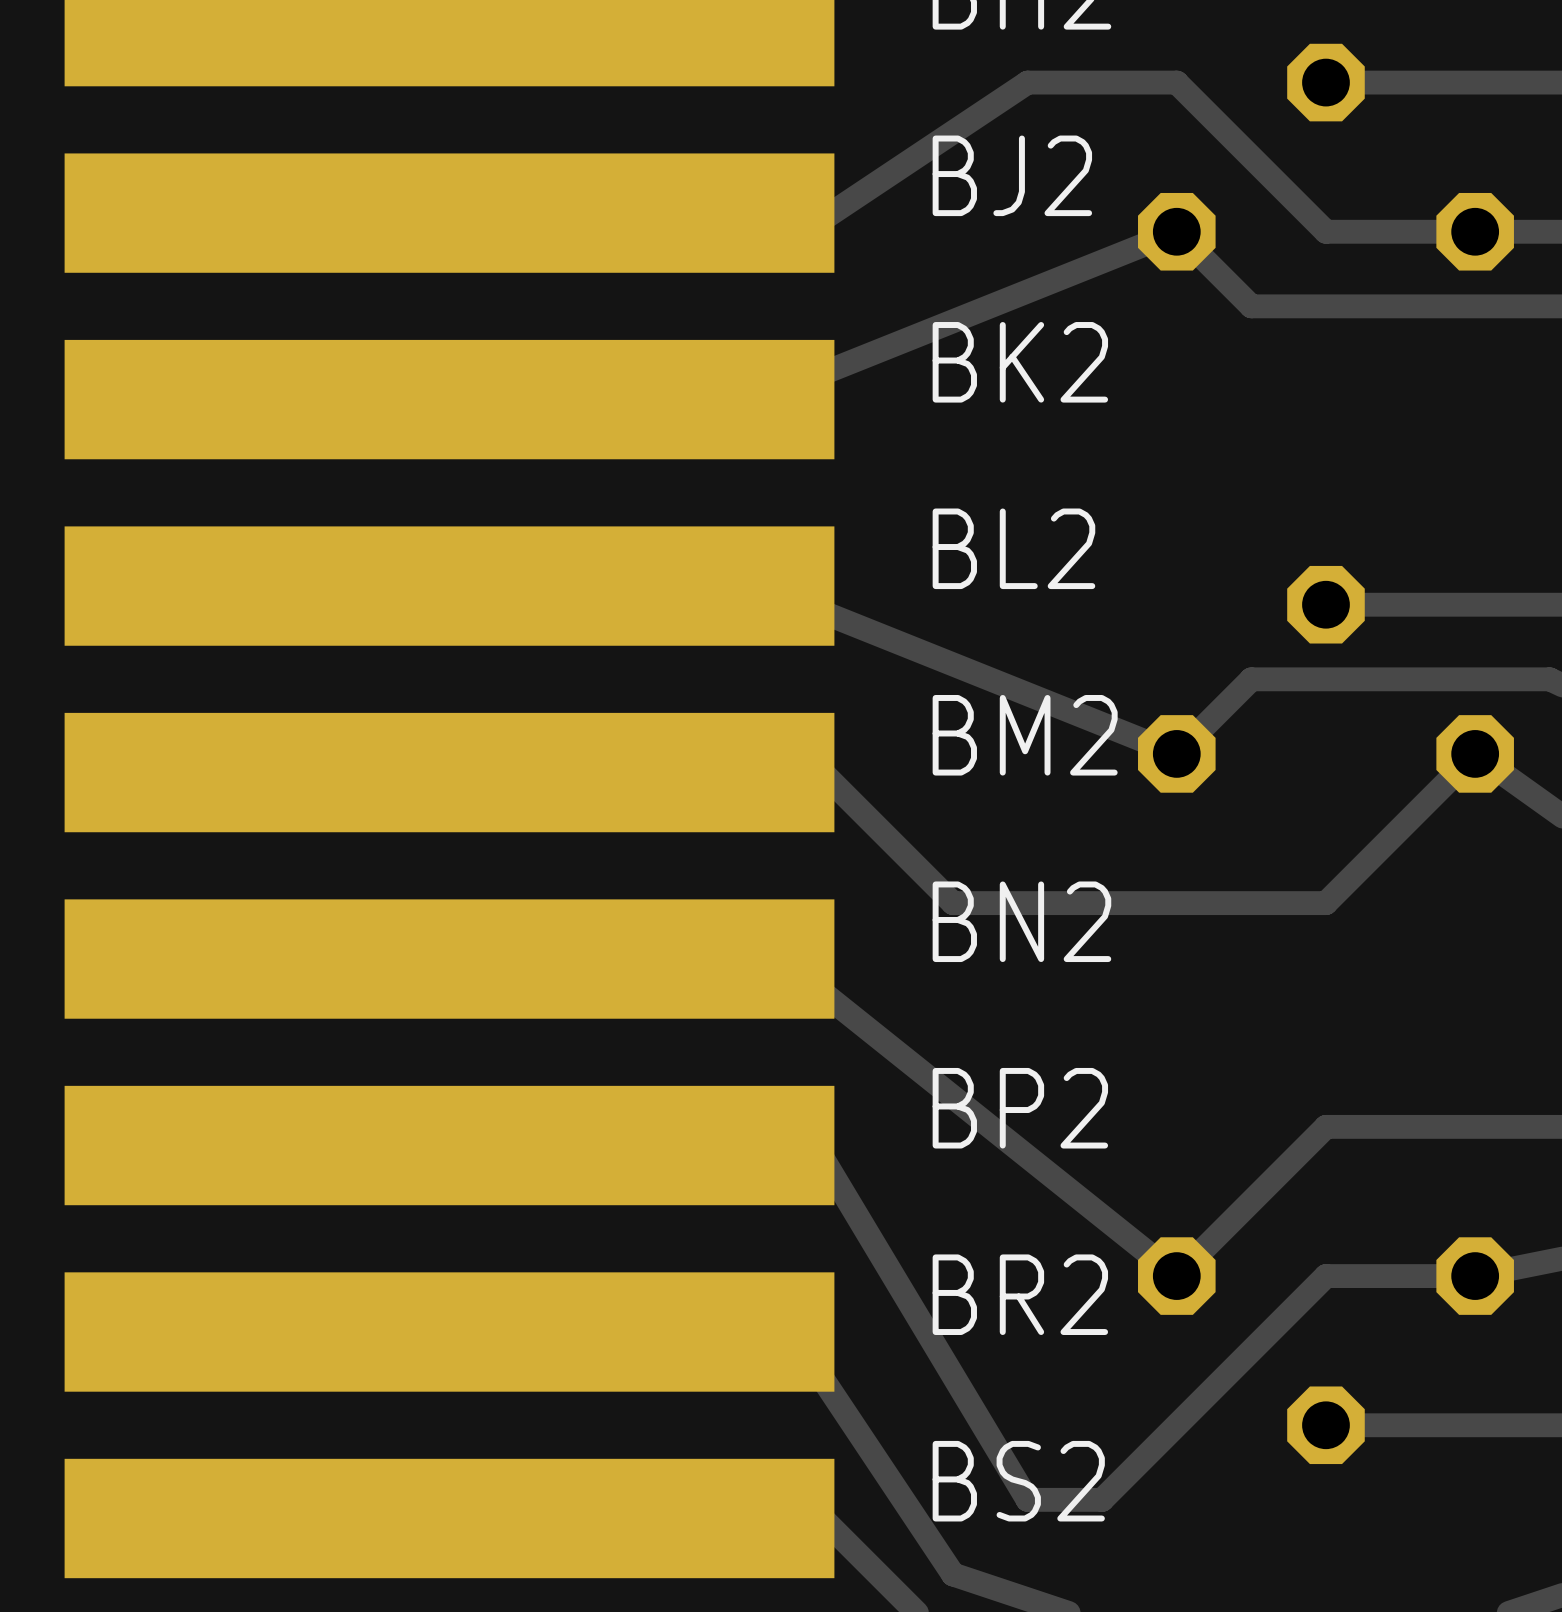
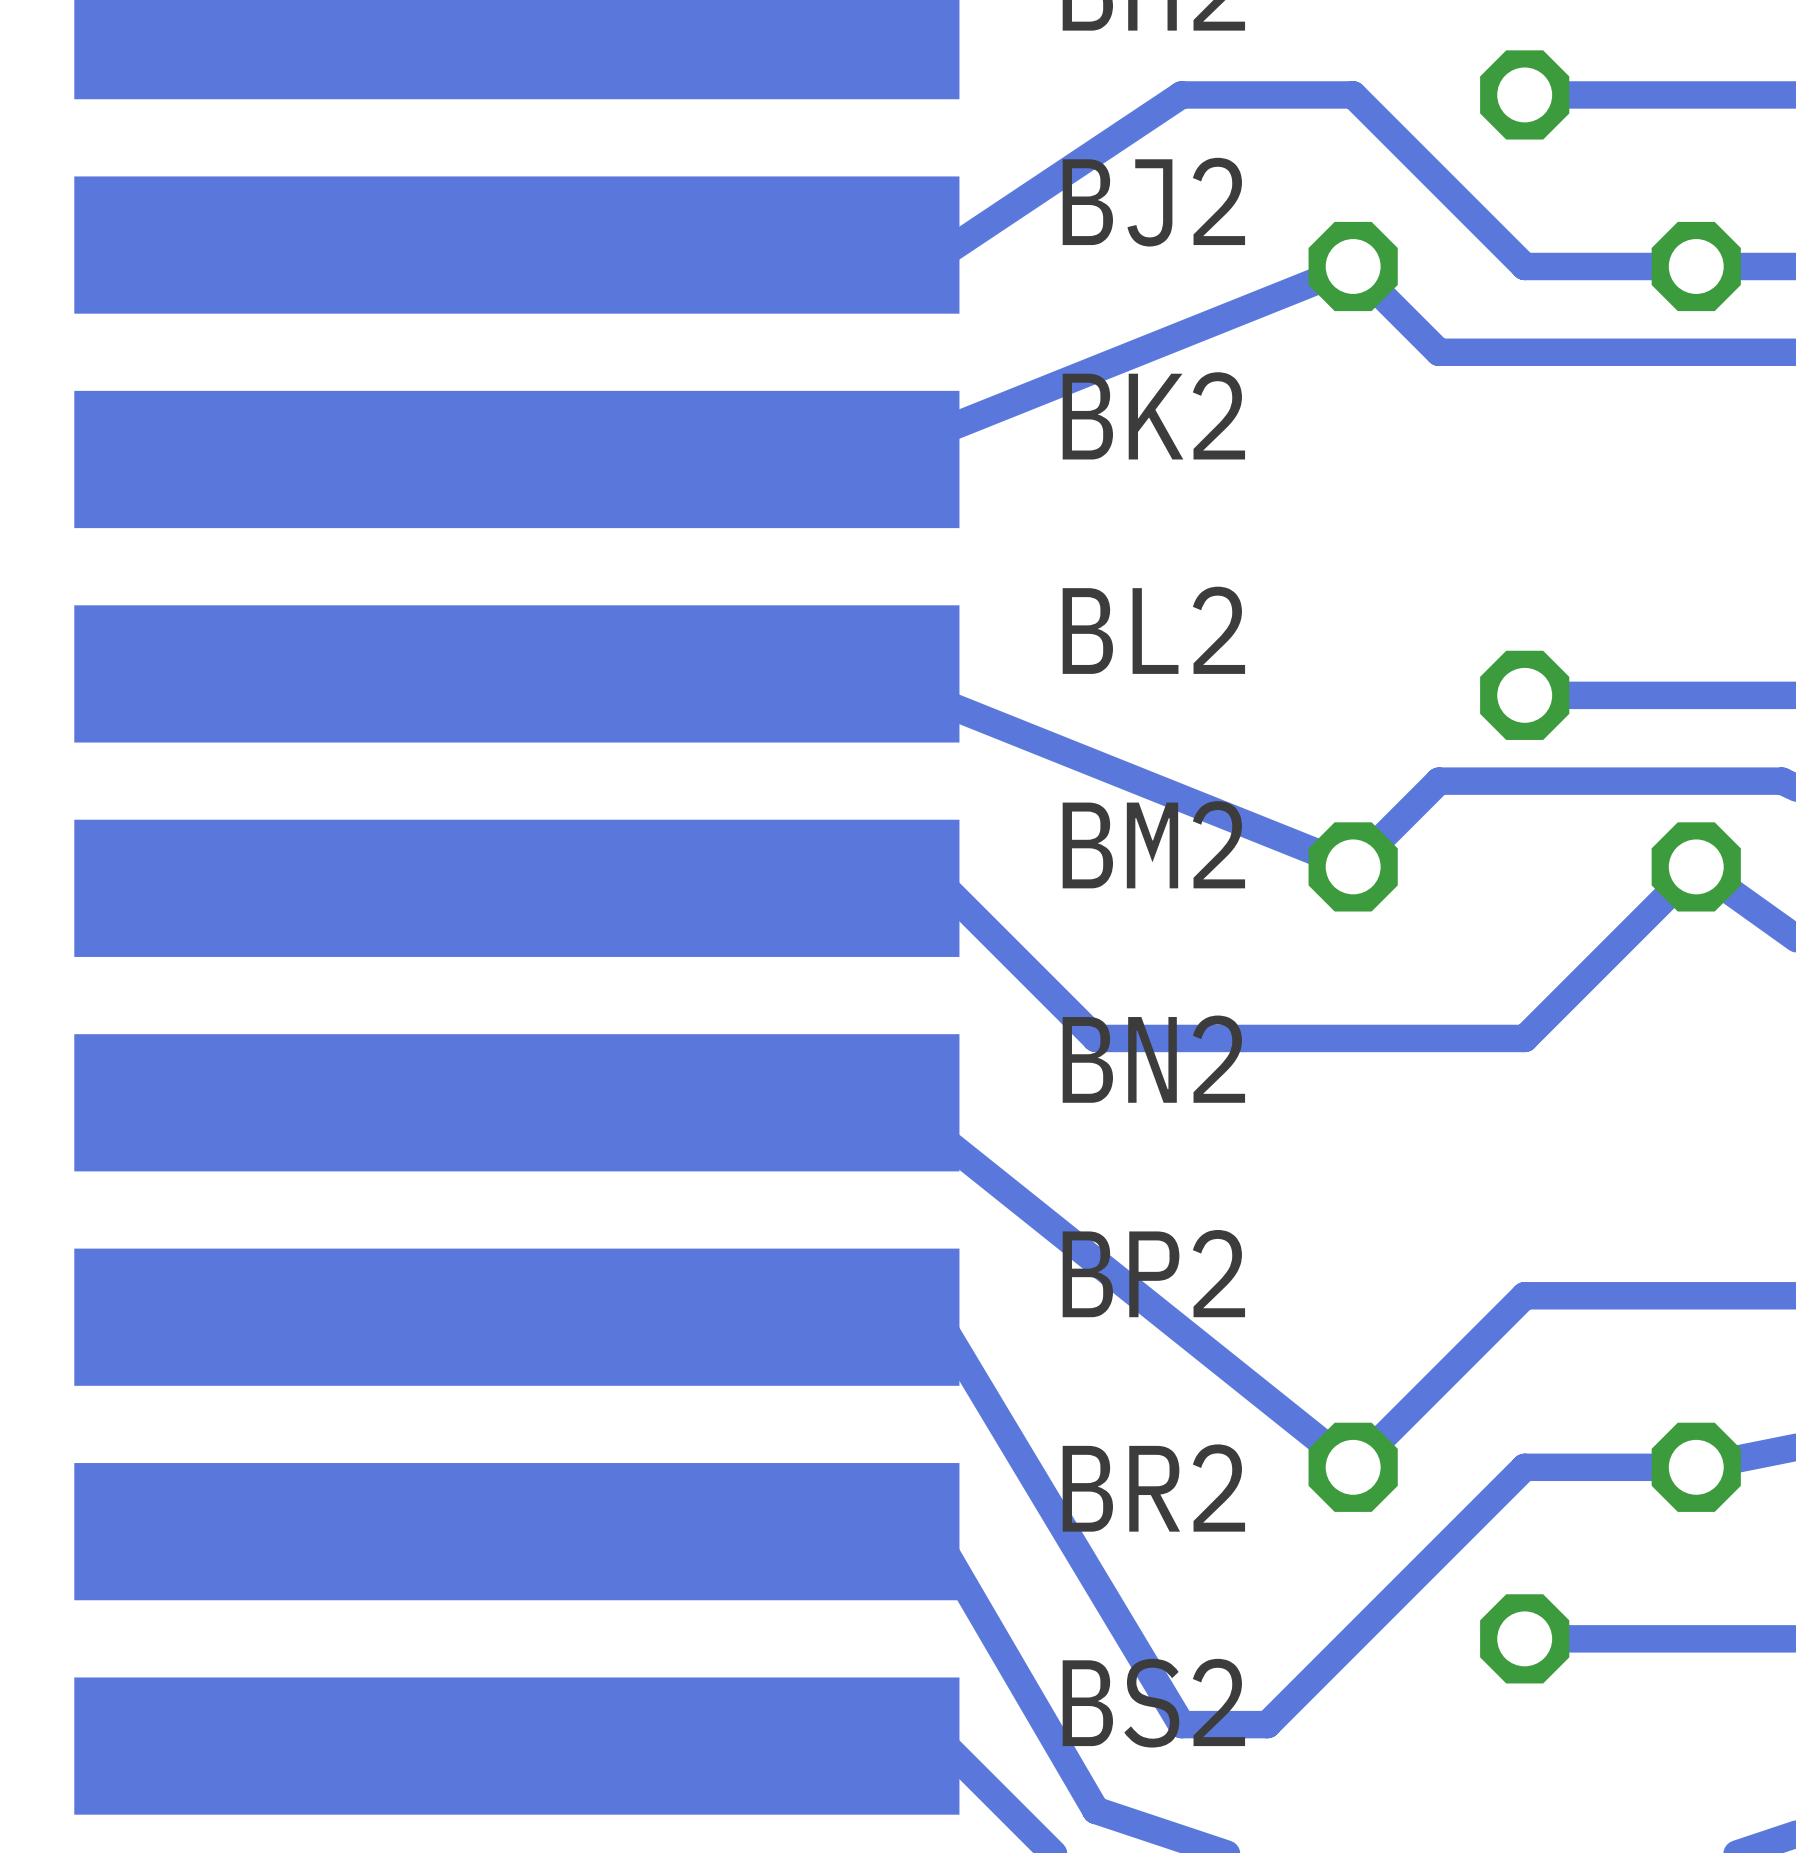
track: (803, 1350) (953, 1574) -> (924, 1553) (945, 1553) (1095, 1810)

